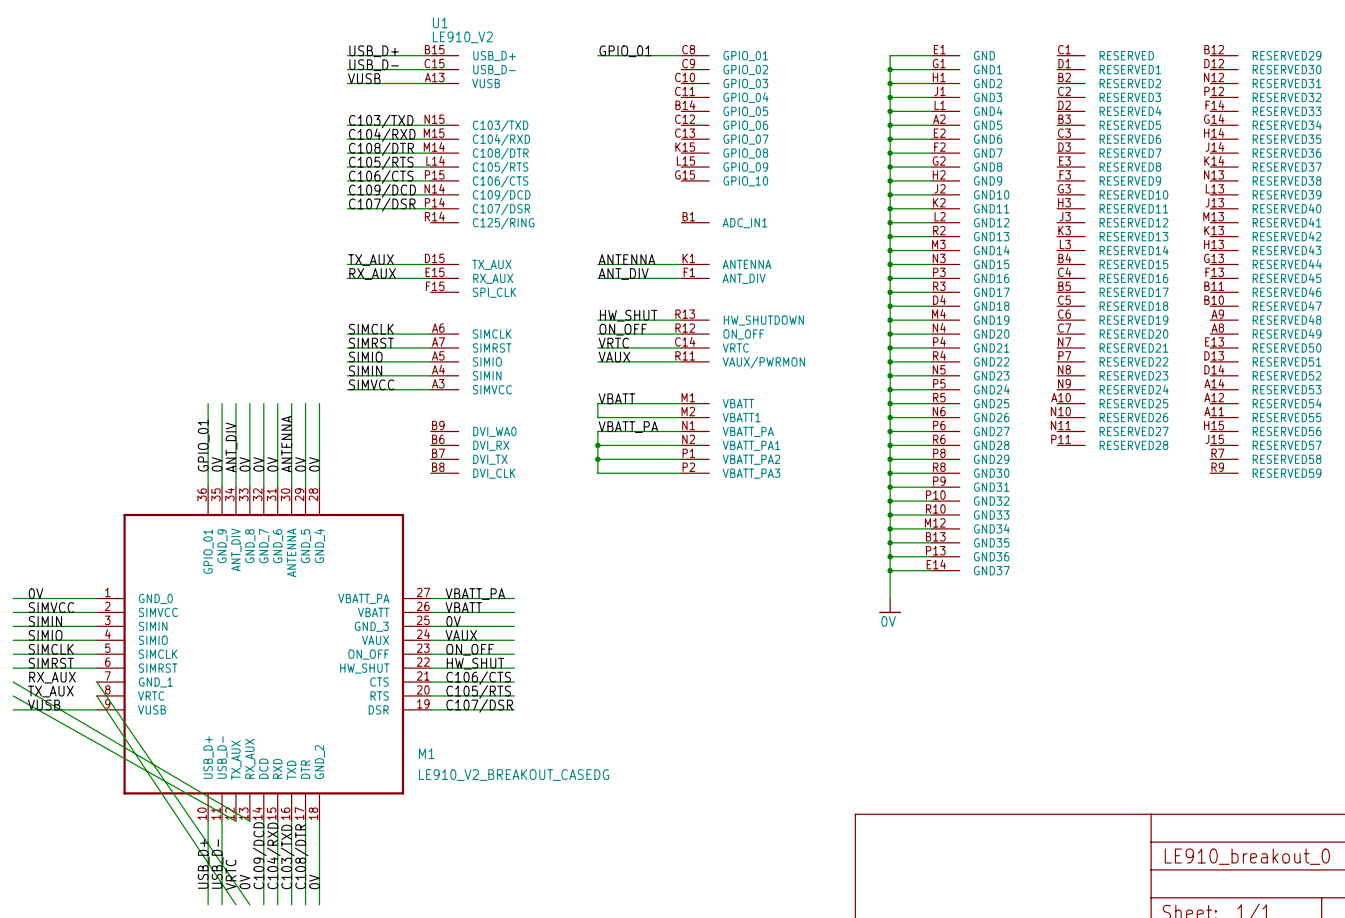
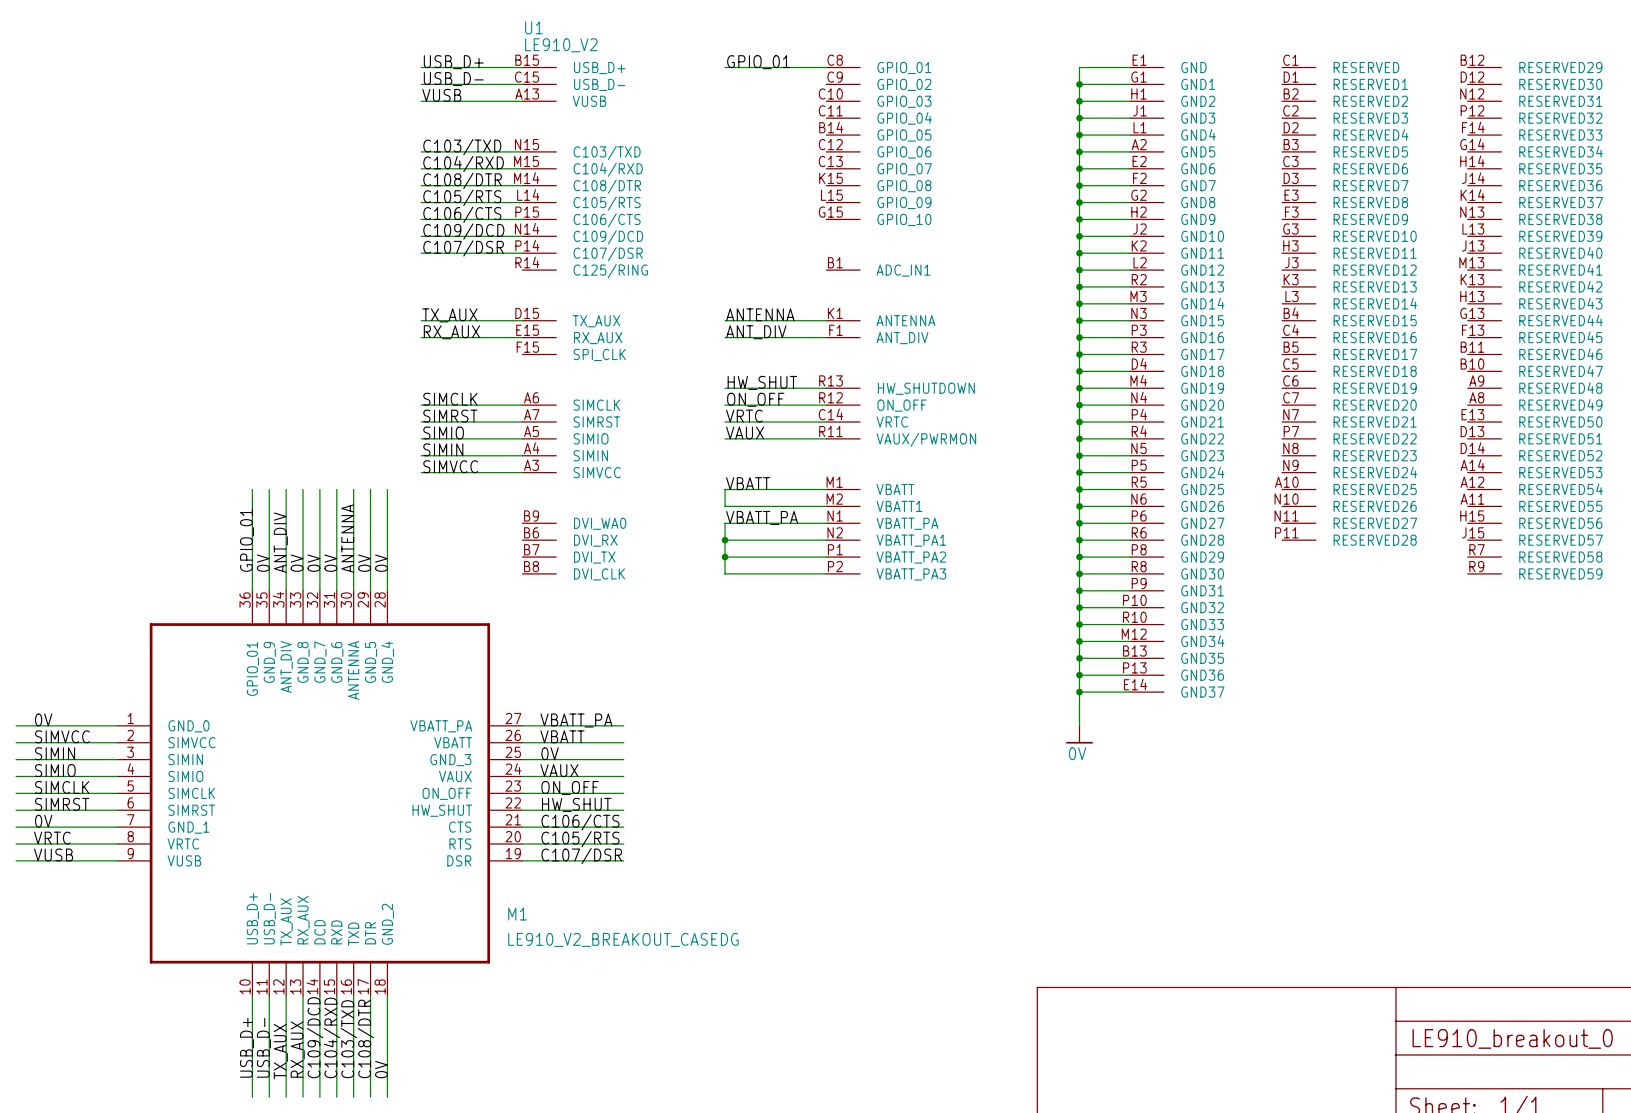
label: RX_AUX (52, 677) -> 0V (43, 821)
wire: (13, 682) (249, 821) -> (16, 827) (117, 827)
wire: (96, 682) (249, 904) -> (303, 995) (303, 1097)
label: TX_AUX (50, 691) -> VRTC (52, 838)
wire: (13, 695) (235, 821) -> (16, 844) (117, 844)
wire: (96, 695) (235, 904) -> (286, 995) (286, 1097)
label: VRTC (231, 874) -> TX_AUX (280, 1051)
label: 0V (245, 881) -> RX_AUX (297, 1049)

